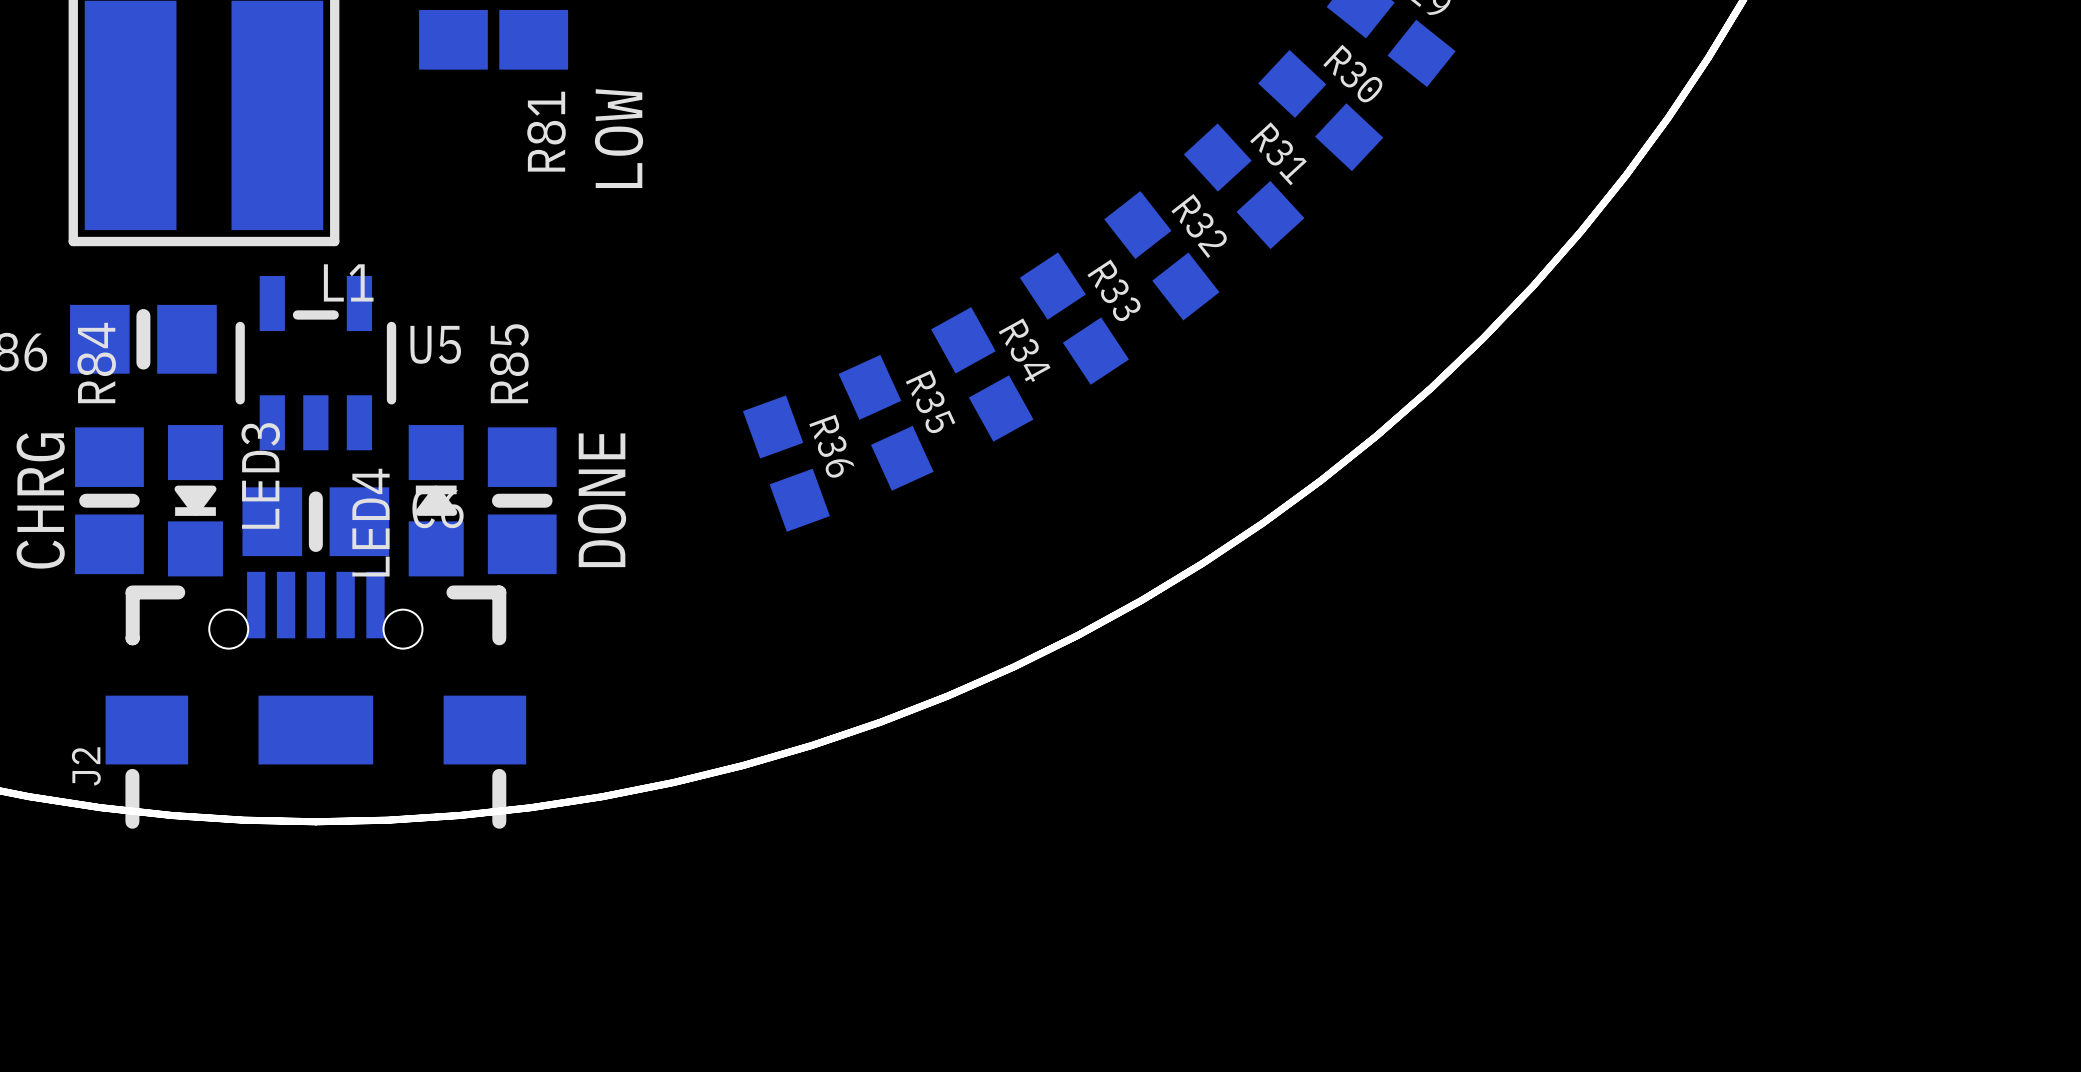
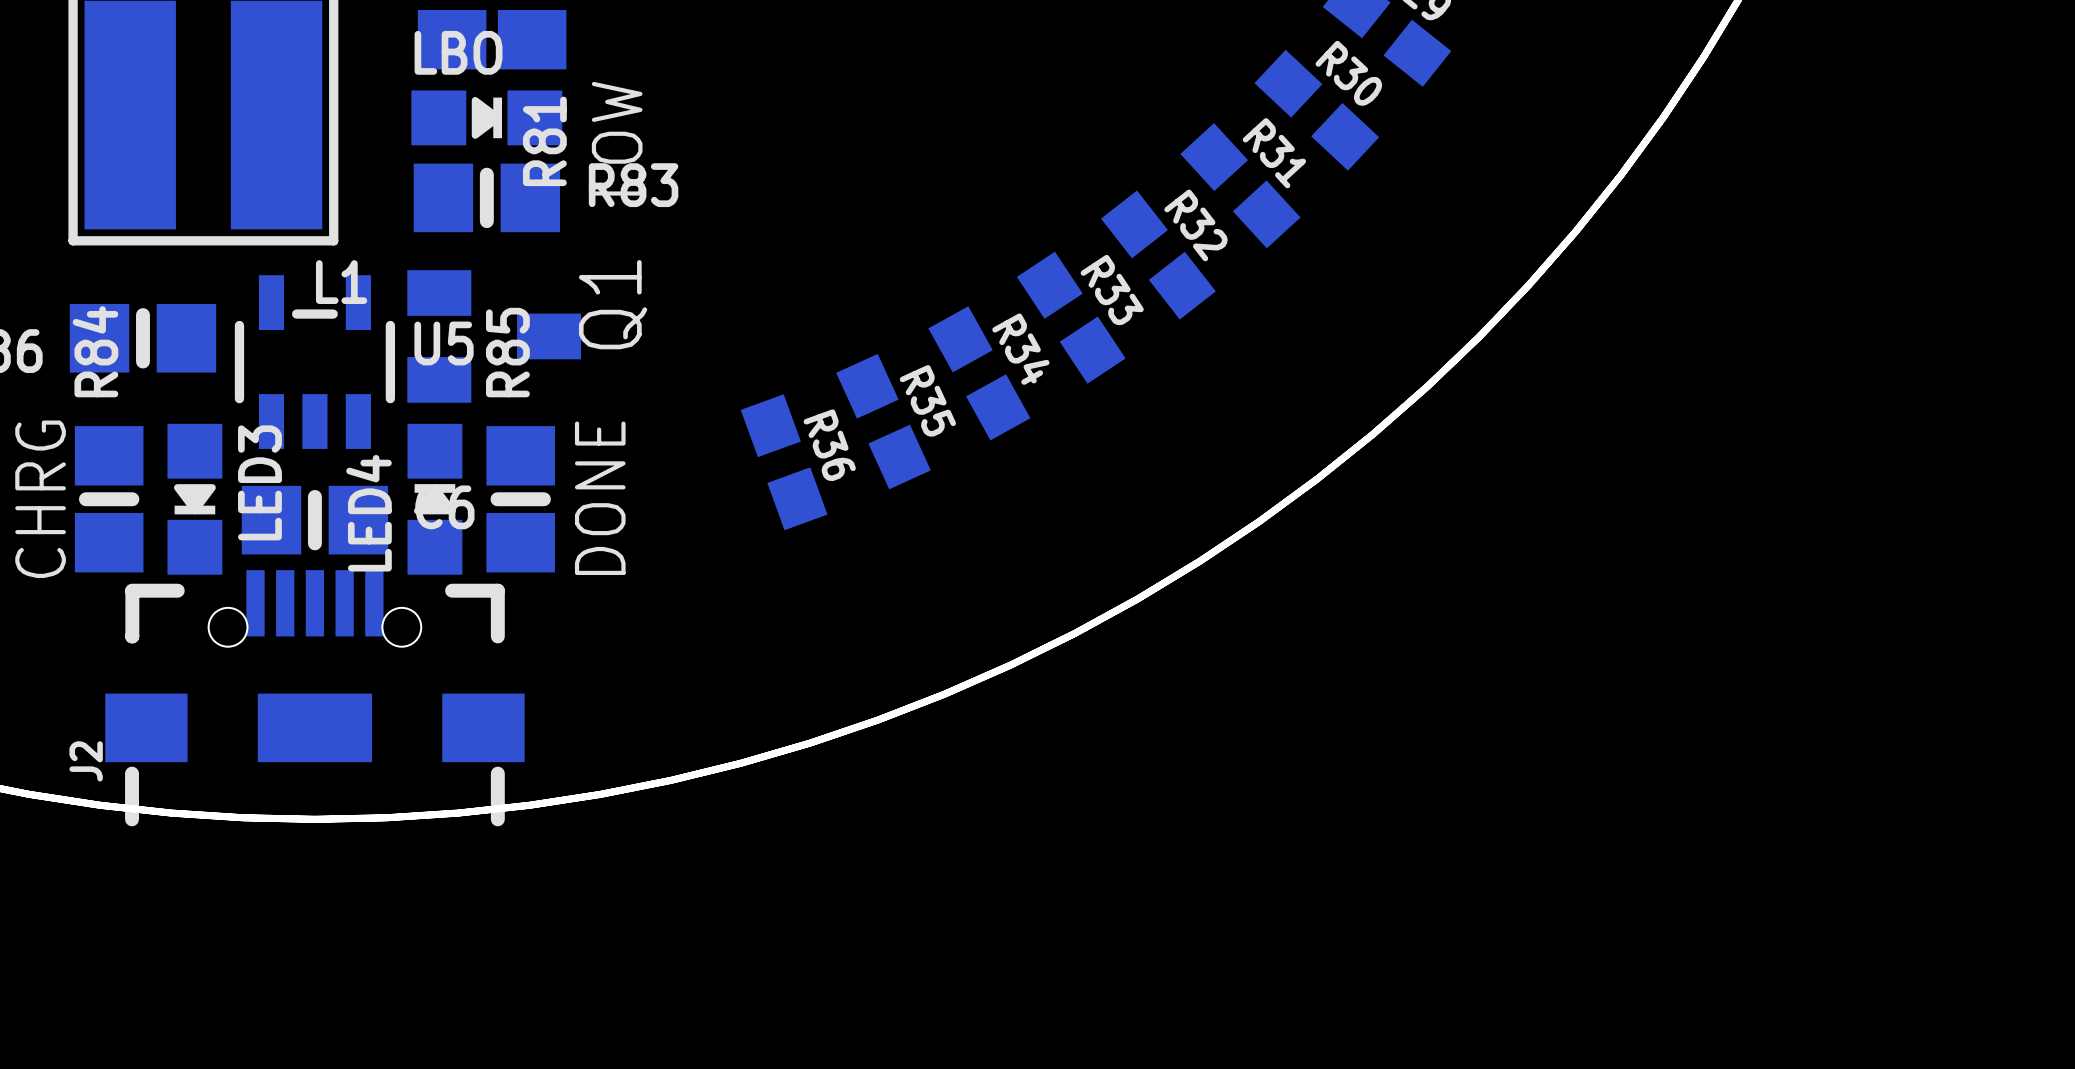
LBO: none -> (486, 117)
R83: none -> (486, 197)
Q1: none -> (494, 336)

